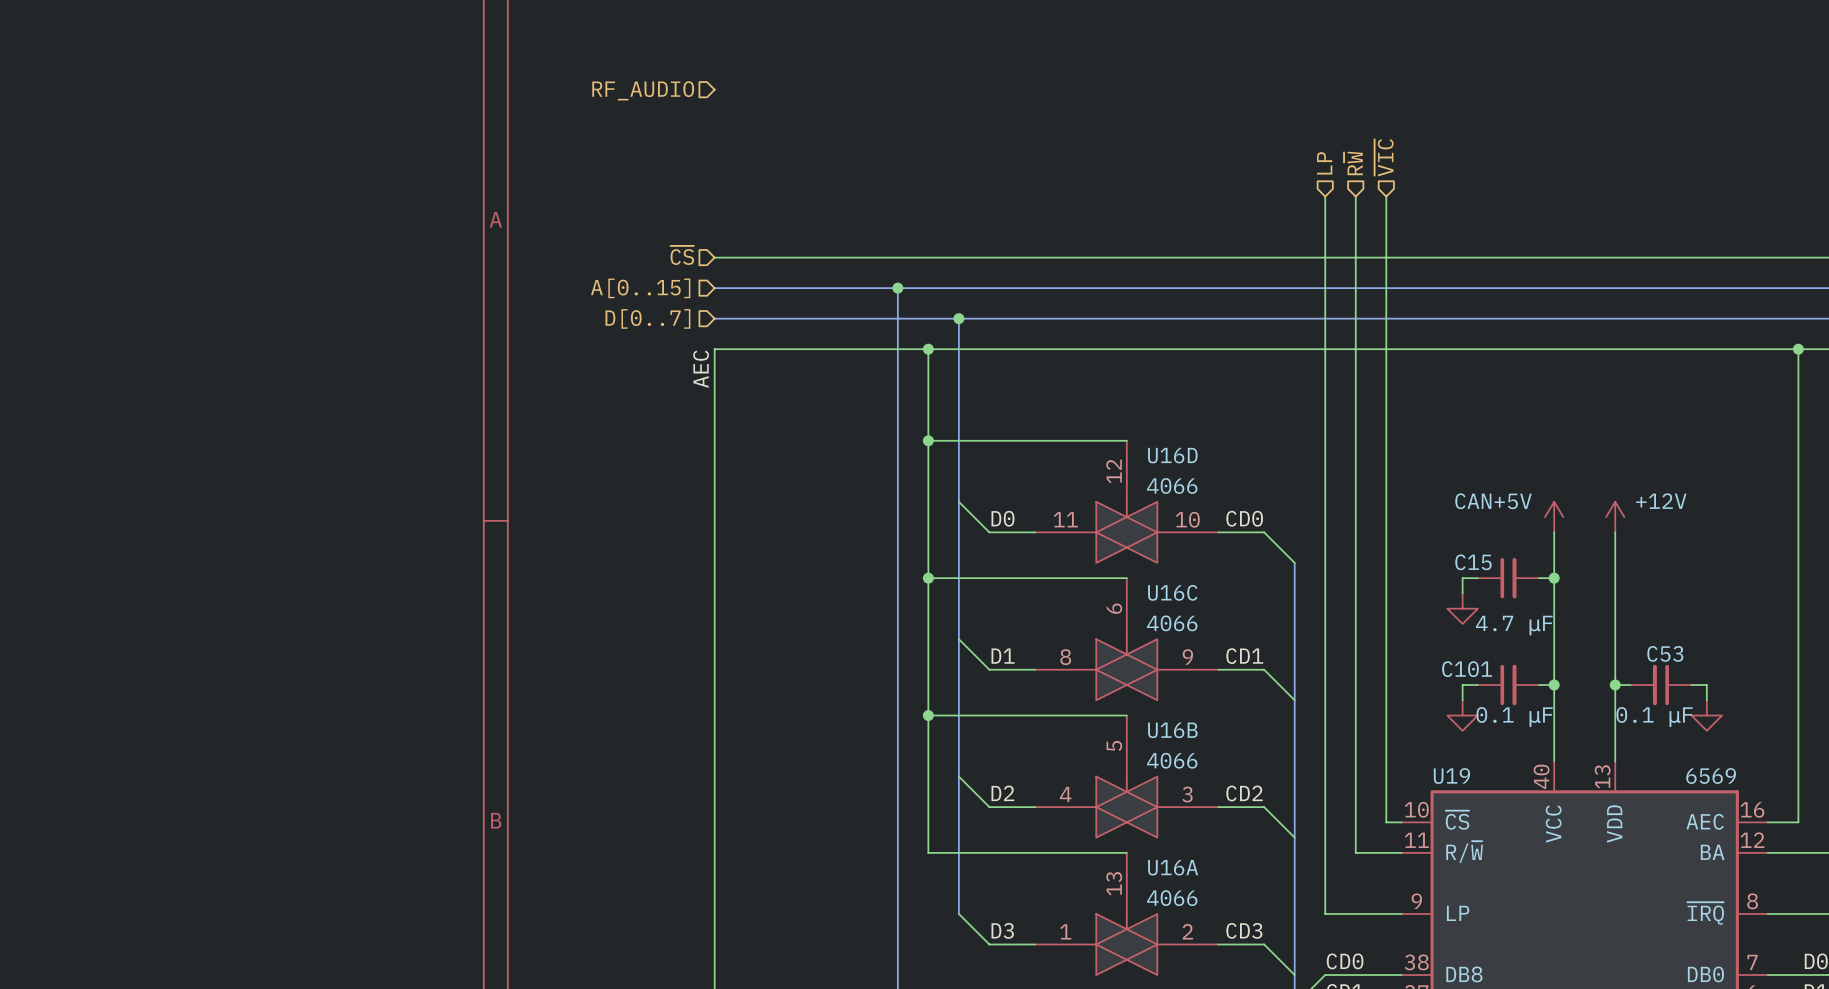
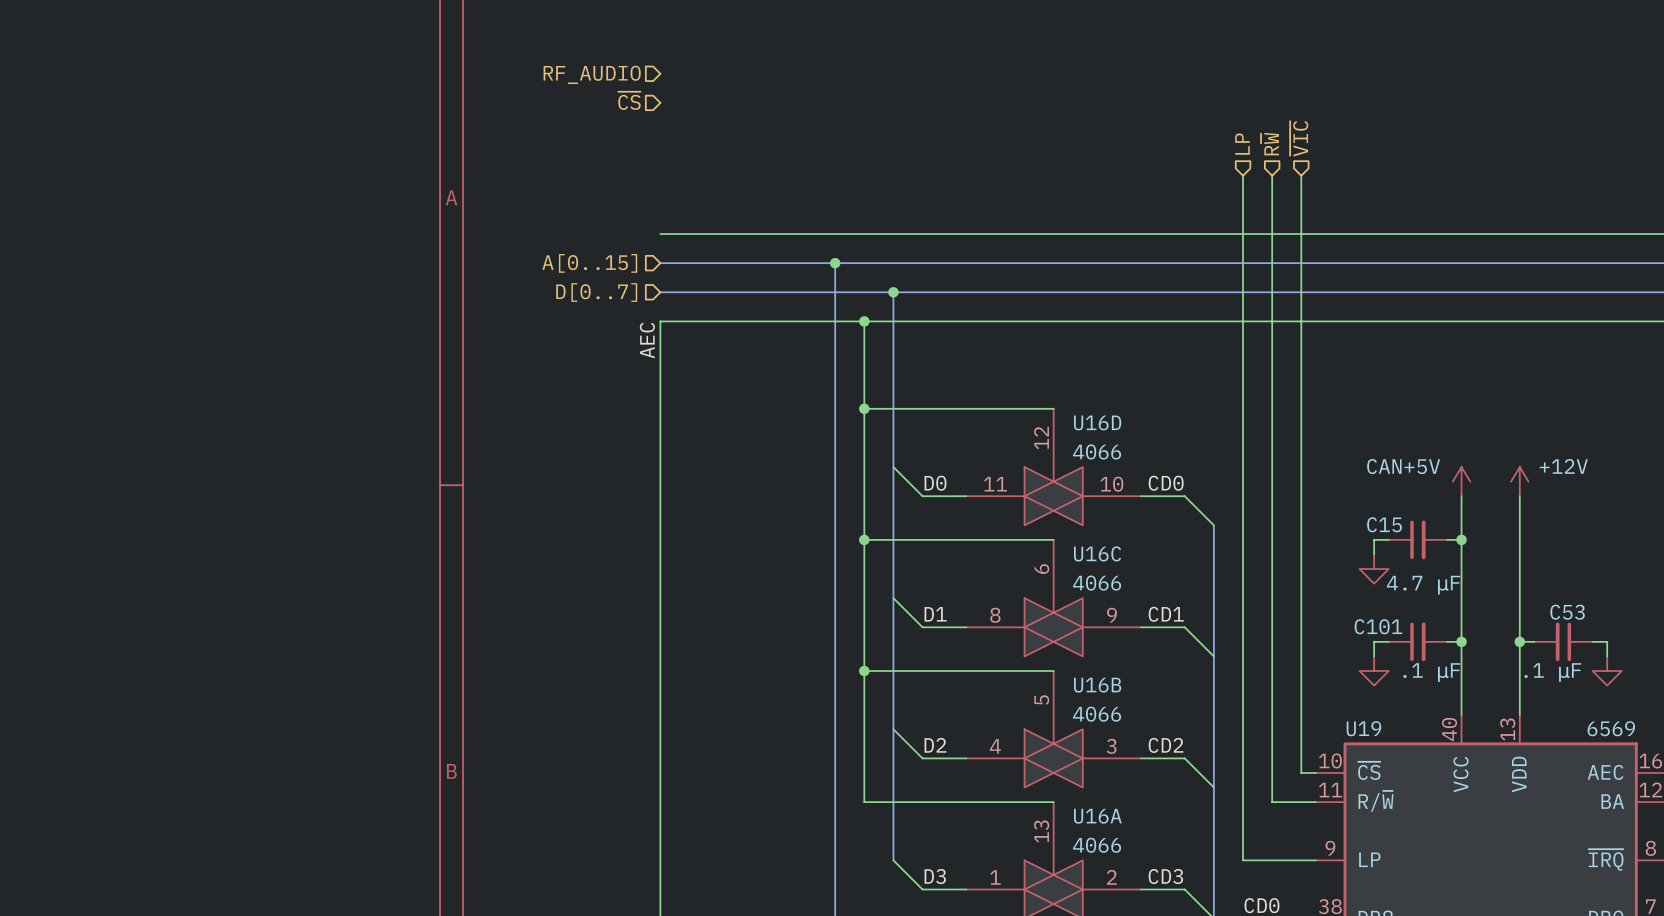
hierarchical label position: ~{CS} (682, 255) -> ~{CS} (629, 100)
C101 value: 0.1 μF (1514, 717) -> .1 μF (1431, 672)
C53 value: 0.1 μF (1654, 717) -> .1 μF (1552, 672)

